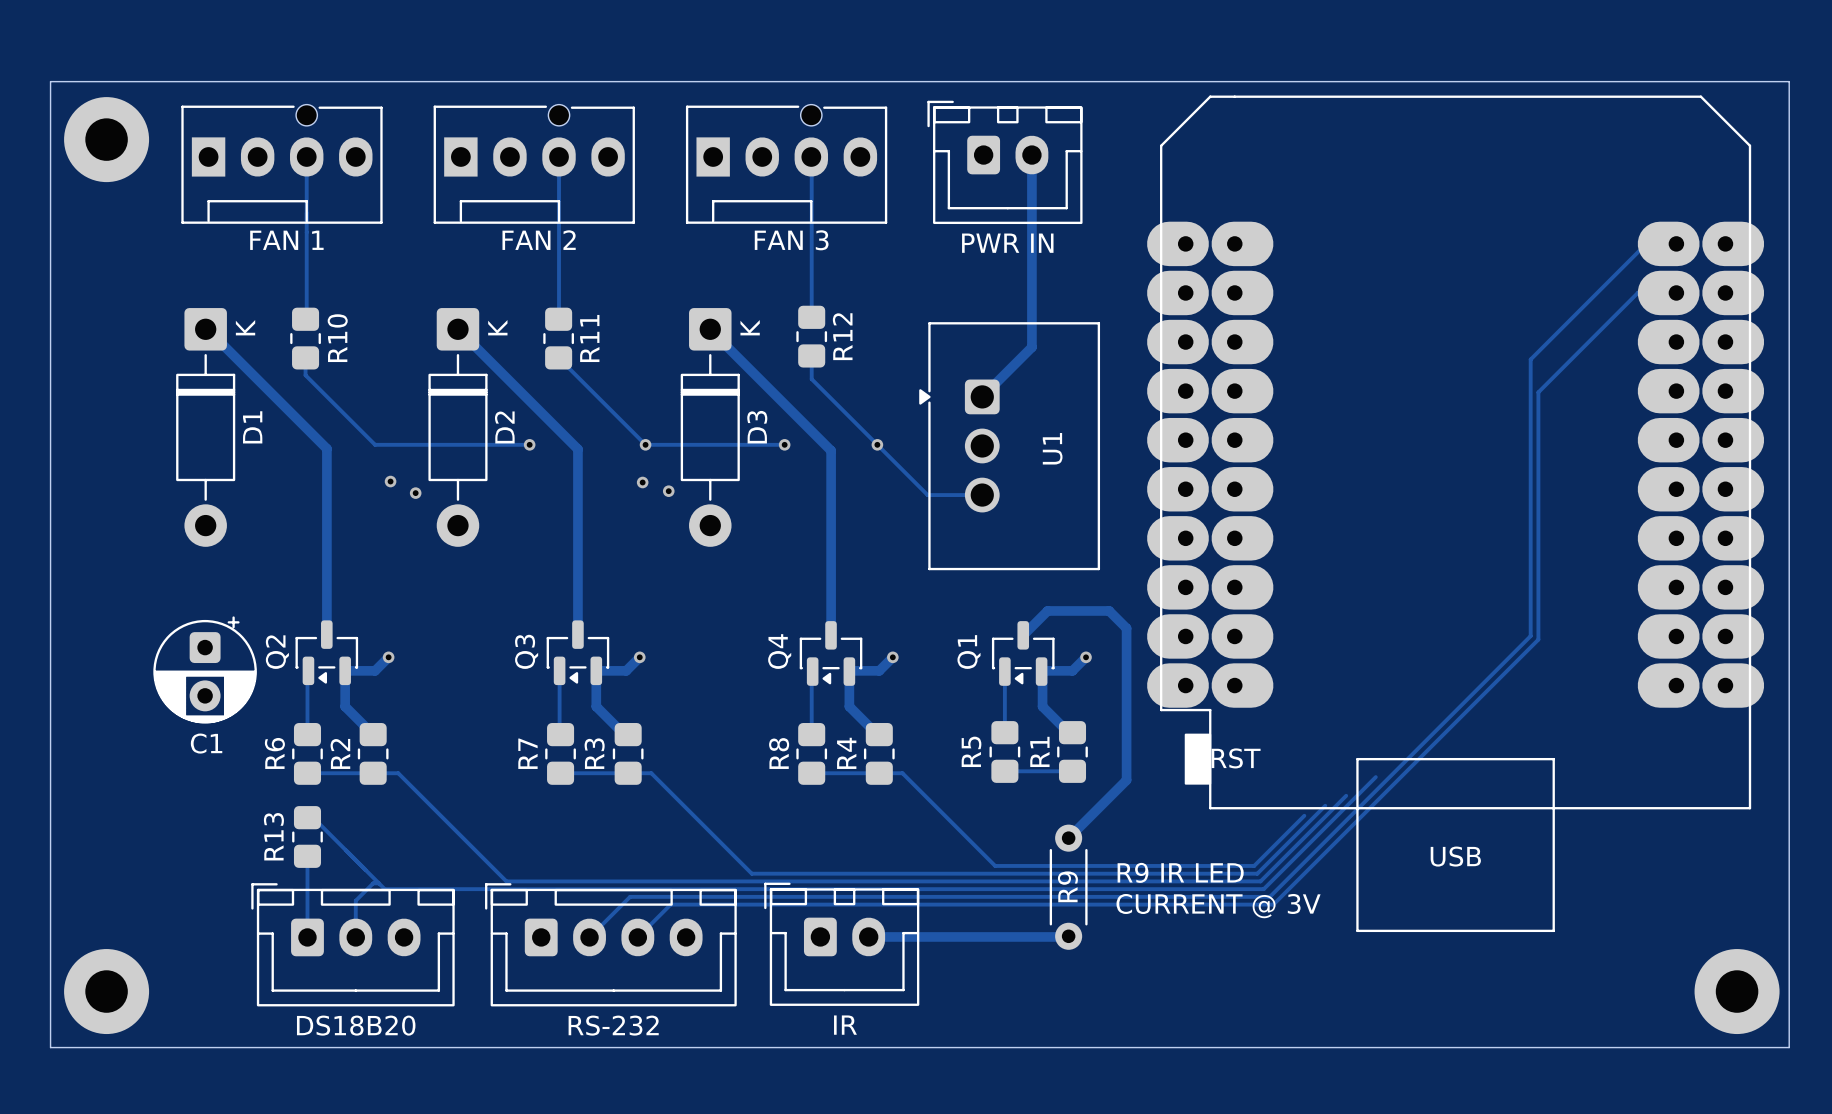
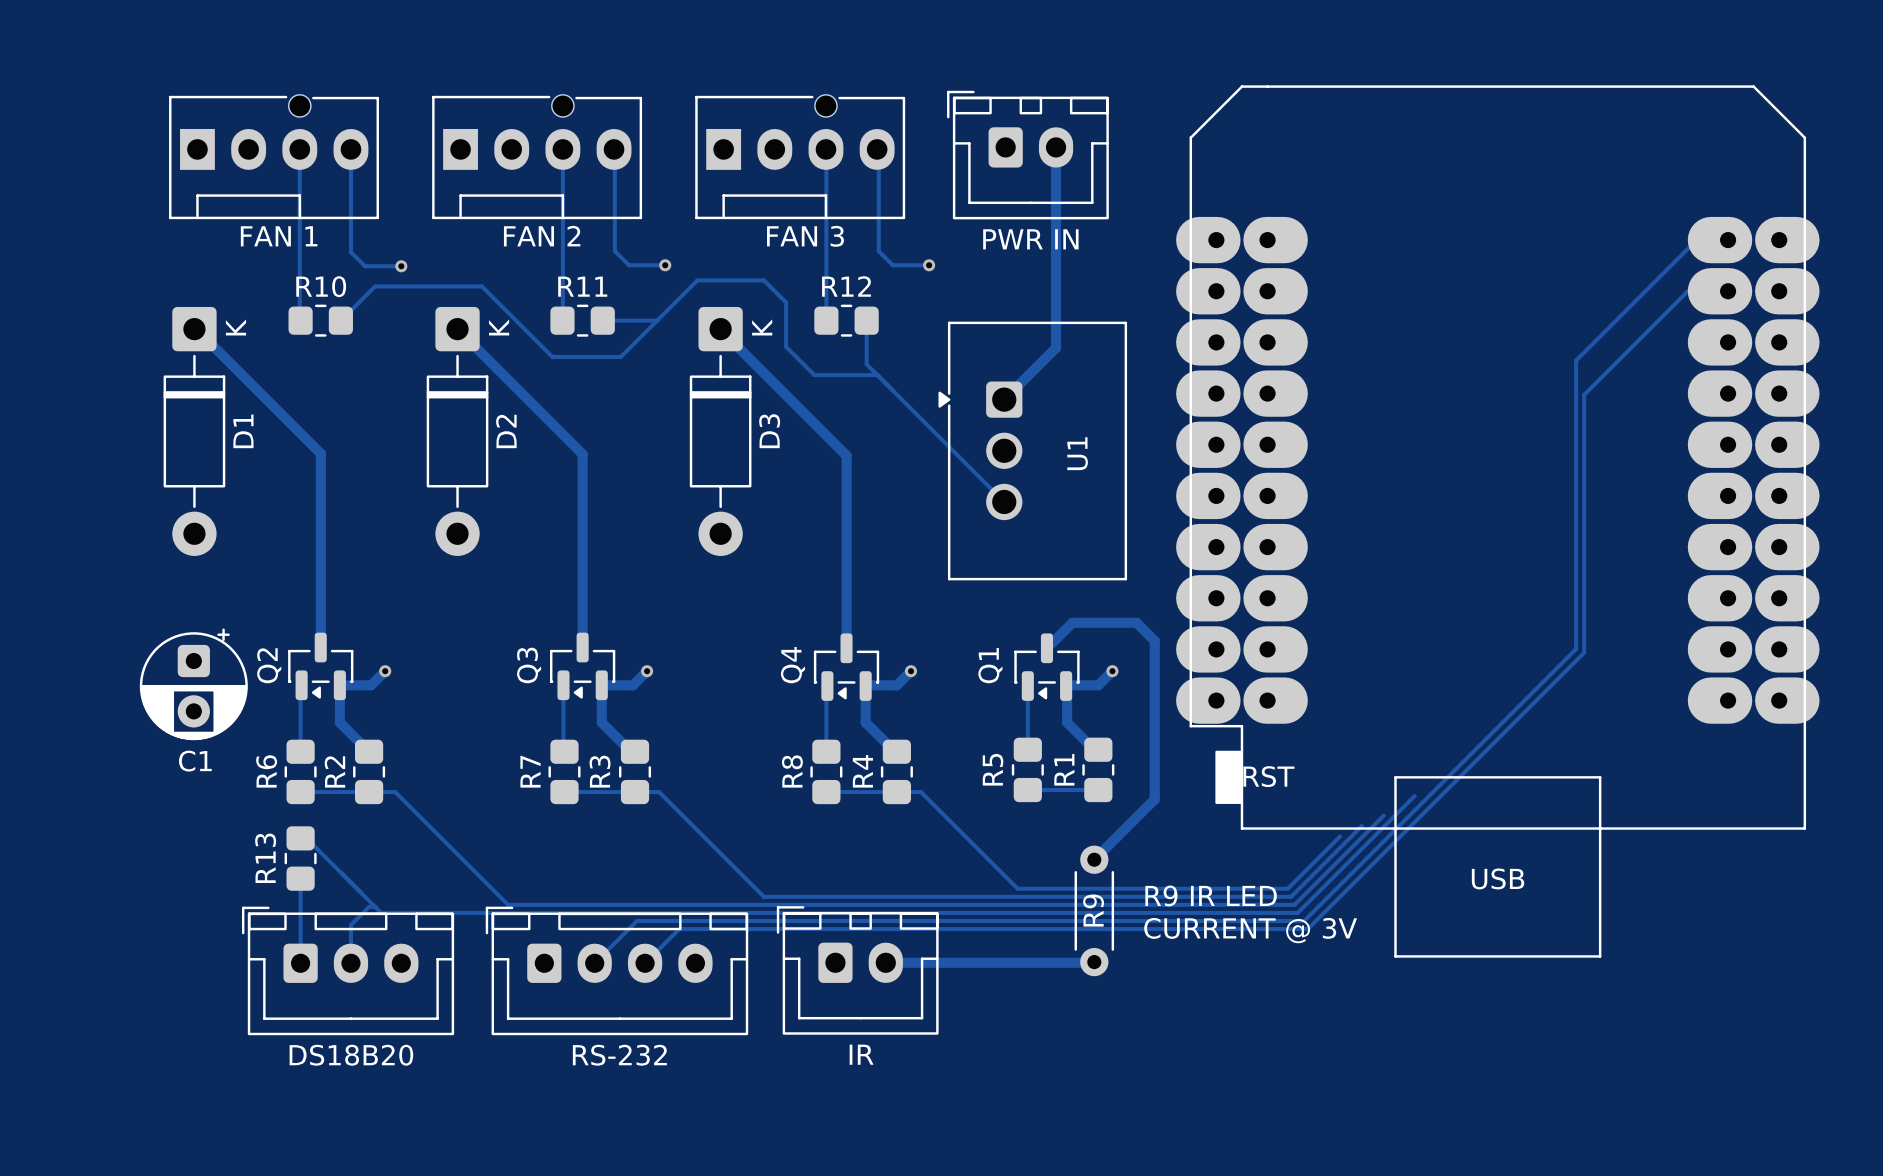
board edge: (50, 81) (1789, 81) (1789, 1047) (50, 1047) (50, 81) -> none
part: (106, 139) -> none
track: none -> (350, 149) (350, 252) (365, 266) (401, 266)
track: none -> (614, 148) (614, 251) (628, 265) (665, 265)
track: none -> (878, 148) (878, 251) (892, 265) (929, 265)
via: none -> (665, 265)
via: none -> (929, 265)
via: none -> (401, 266)
track: none -> (340, 320) (375, 286) (481, 286) (552, 356) (620, 356) (697, 280) (763, 280) (786, 302) (786, 346) (814, 375) (877, 375)
track: none -> (602, 320) (657, 320)
R12 rotation: 0° (811, 336) -> 90° clockwise (846, 320)
R12 name position: R12 (842, 336) -> R12 (846, 286)
R10 rotation: 0° (305, 338) -> 90° clockwise (320, 320)
R10 name position: R10 (337, 338) -> R10 (321, 286)
R11 rotation: 0° (558, 338) -> 90° clockwise (582, 320)
R11 name position: R11 (589, 338) -> R11 (582, 286)
track: (811, 355) (811, 379) (927, 495) (982, 495) -> (866, 320) (866, 364) (1004, 501)
track: (305, 357) (305, 375) (375, 444) (529, 444) -> none
track: (558, 357) (645, 444) (784, 444) -> none
via: (529, 444) -> none
via: (645, 444) -> none
via: (784, 444) -> none
via: (877, 444) -> none
via: (390, 481) -> none
via: (642, 482) -> none
via: (668, 491) -> none
via: (415, 493) -> none
part: (106, 991) -> none
part: (1737, 991) -> none

